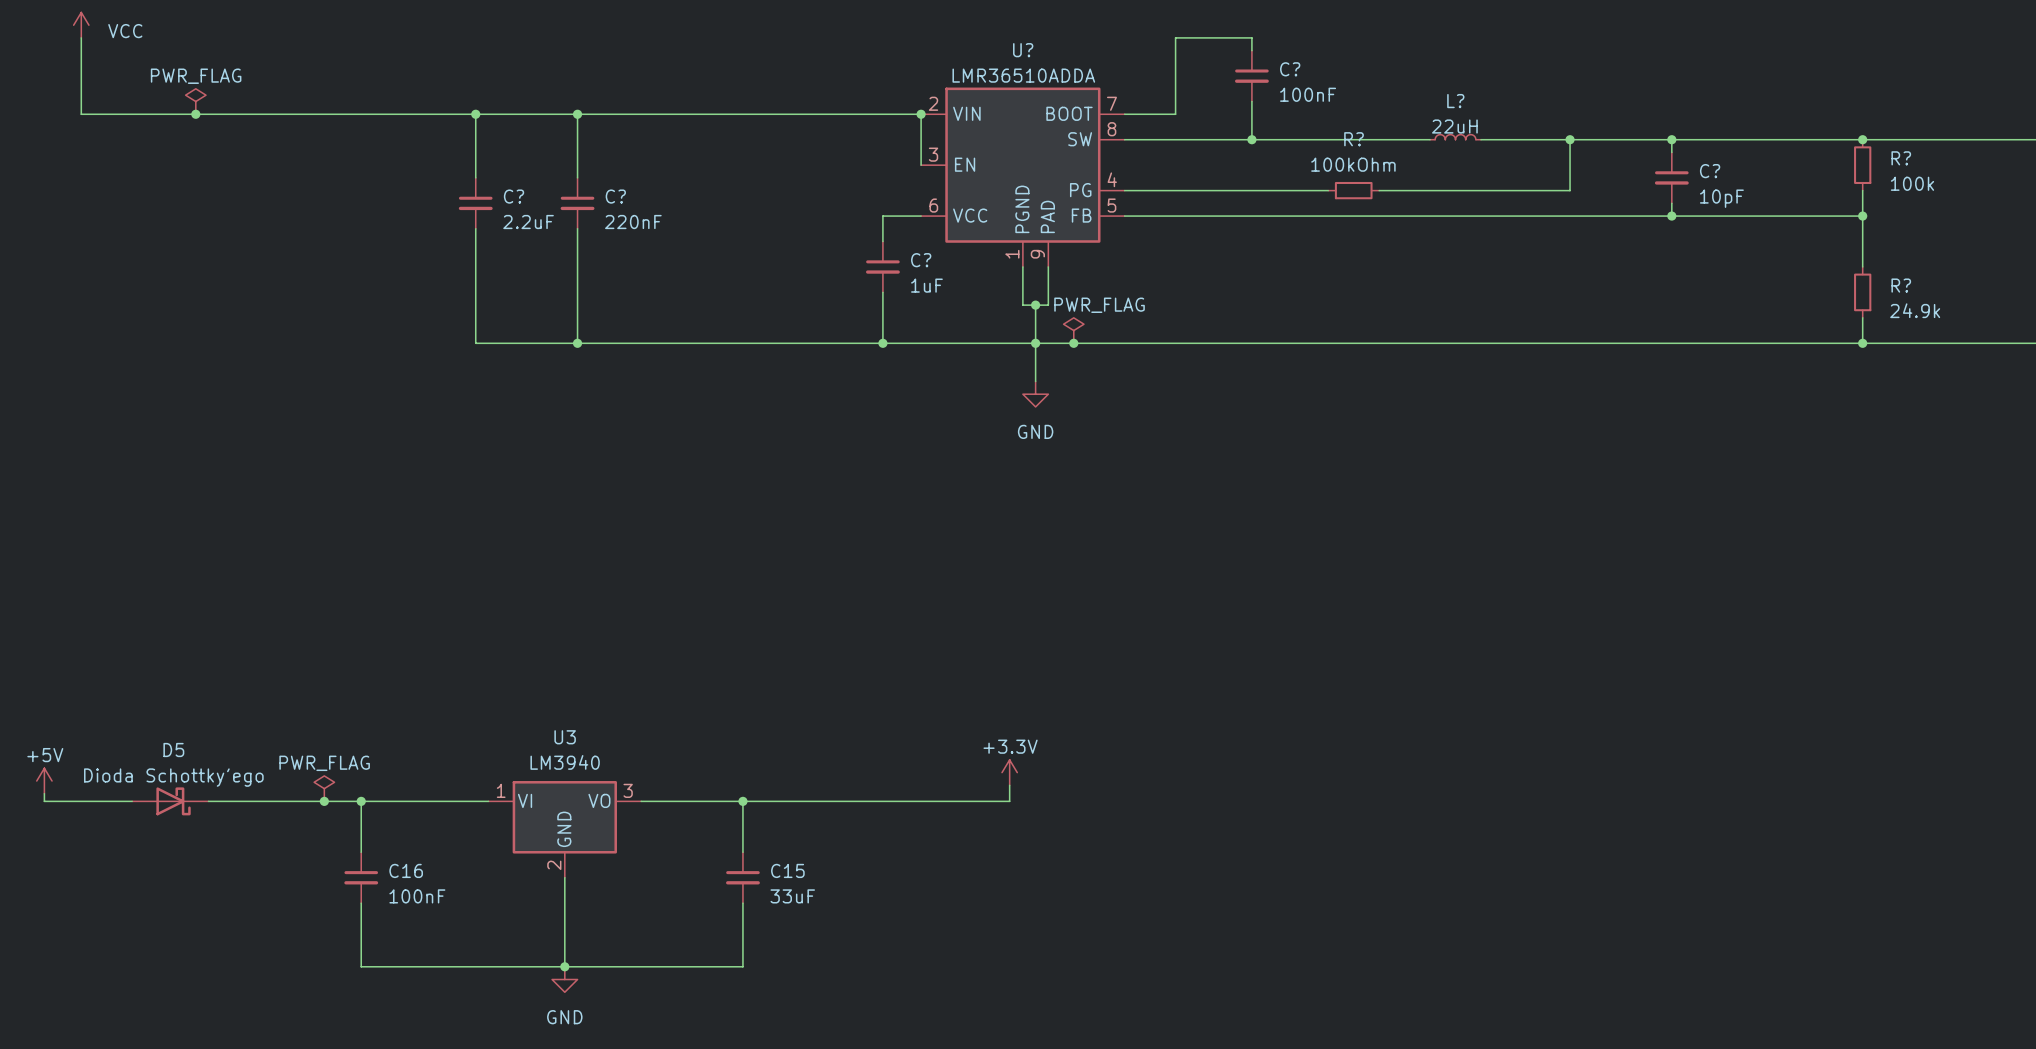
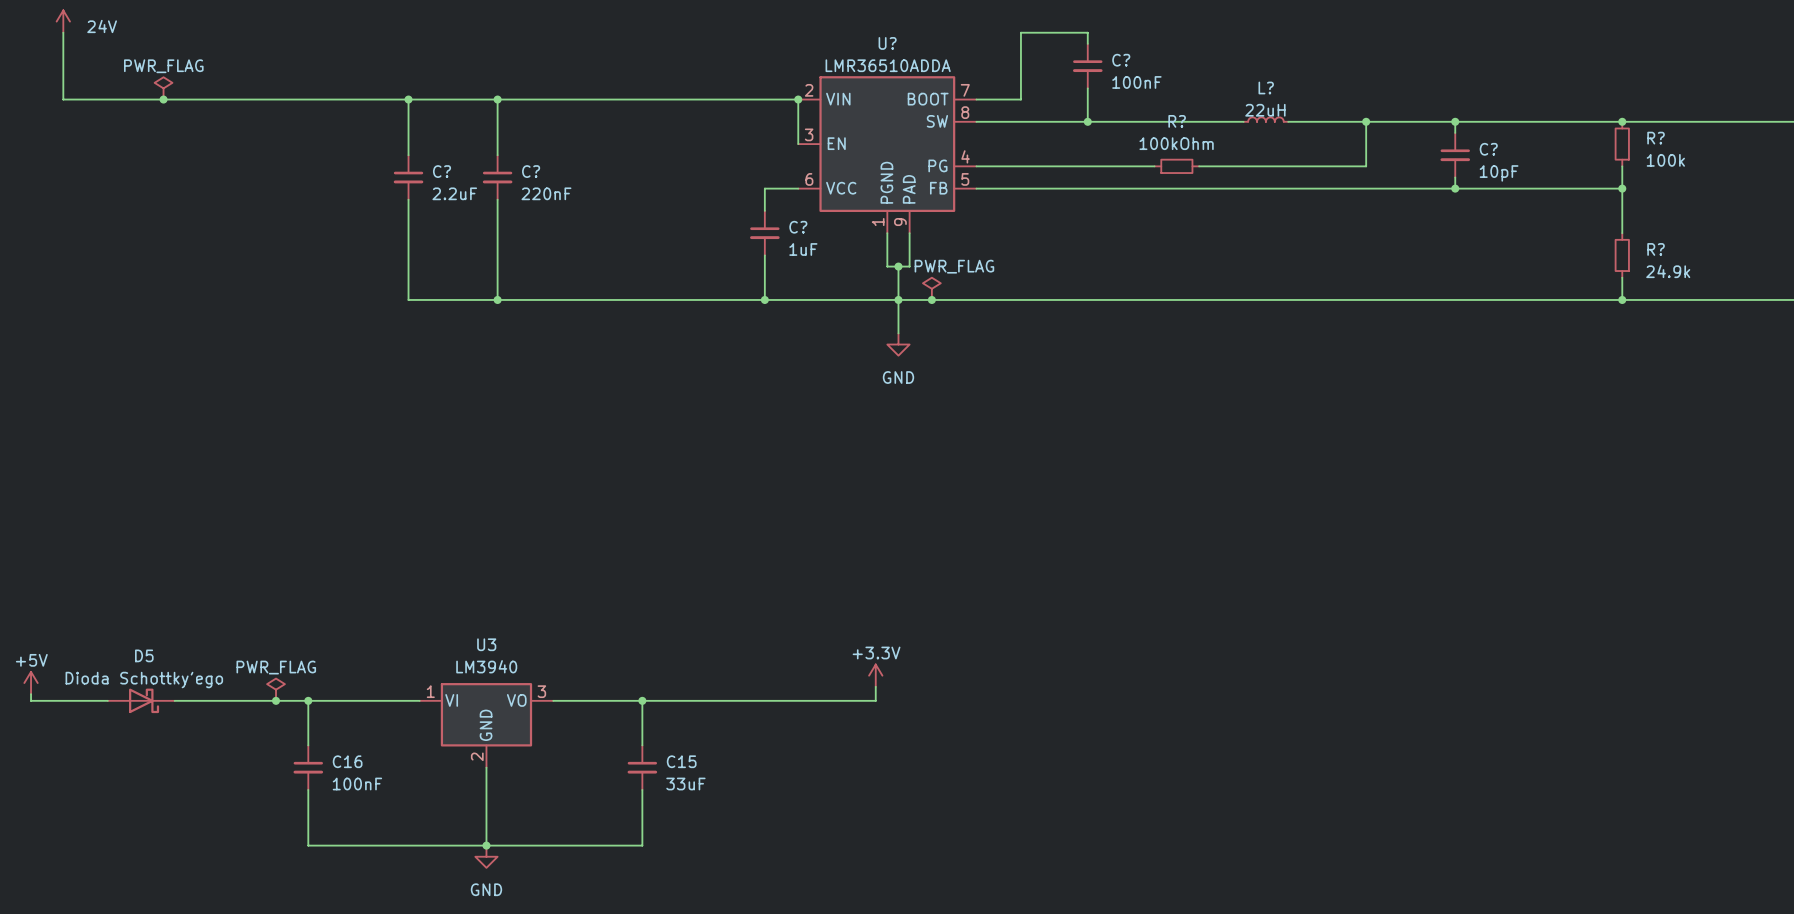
power symbol: VCC (81, 25) -> 24V (63, 21)

